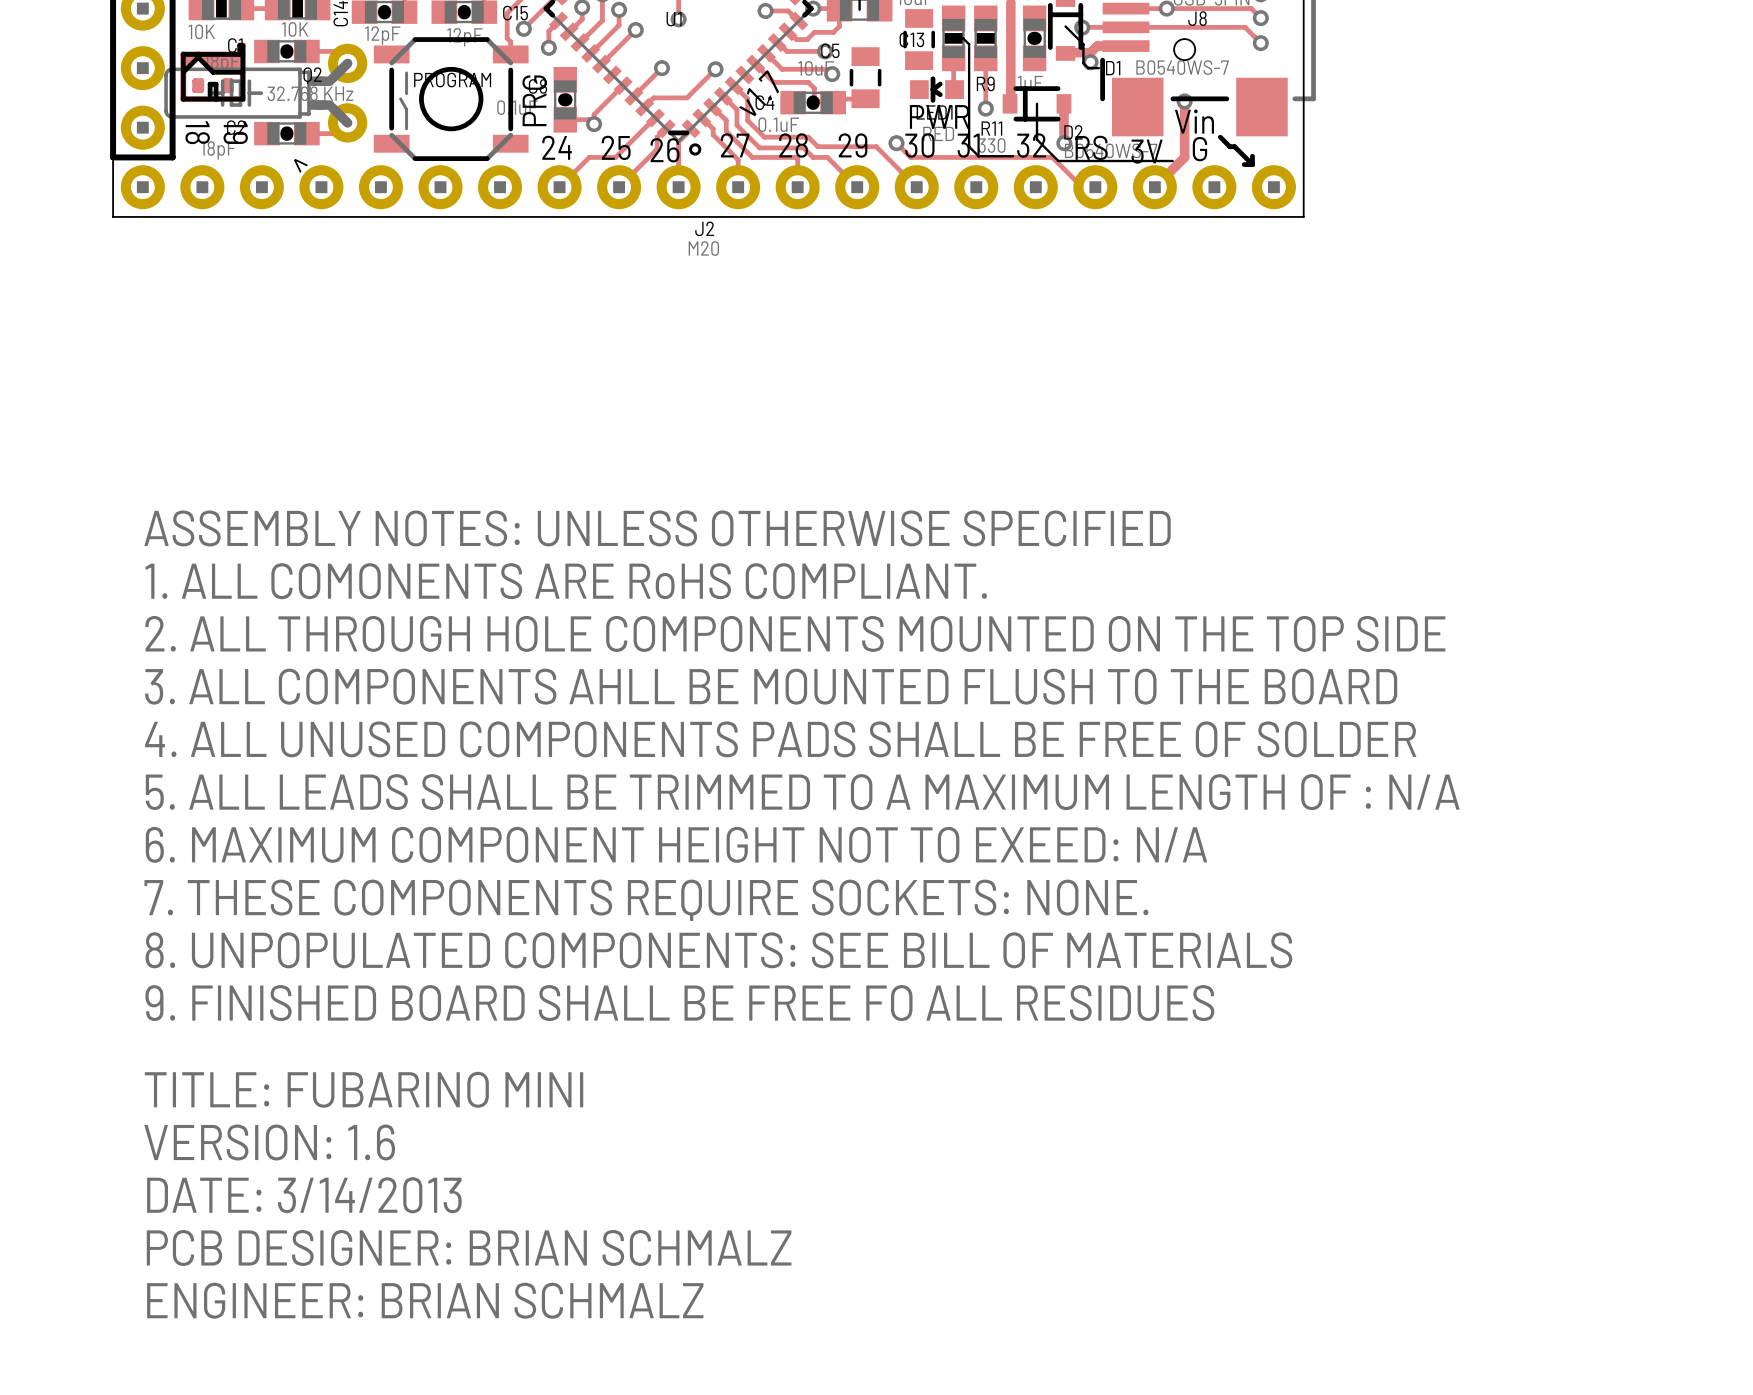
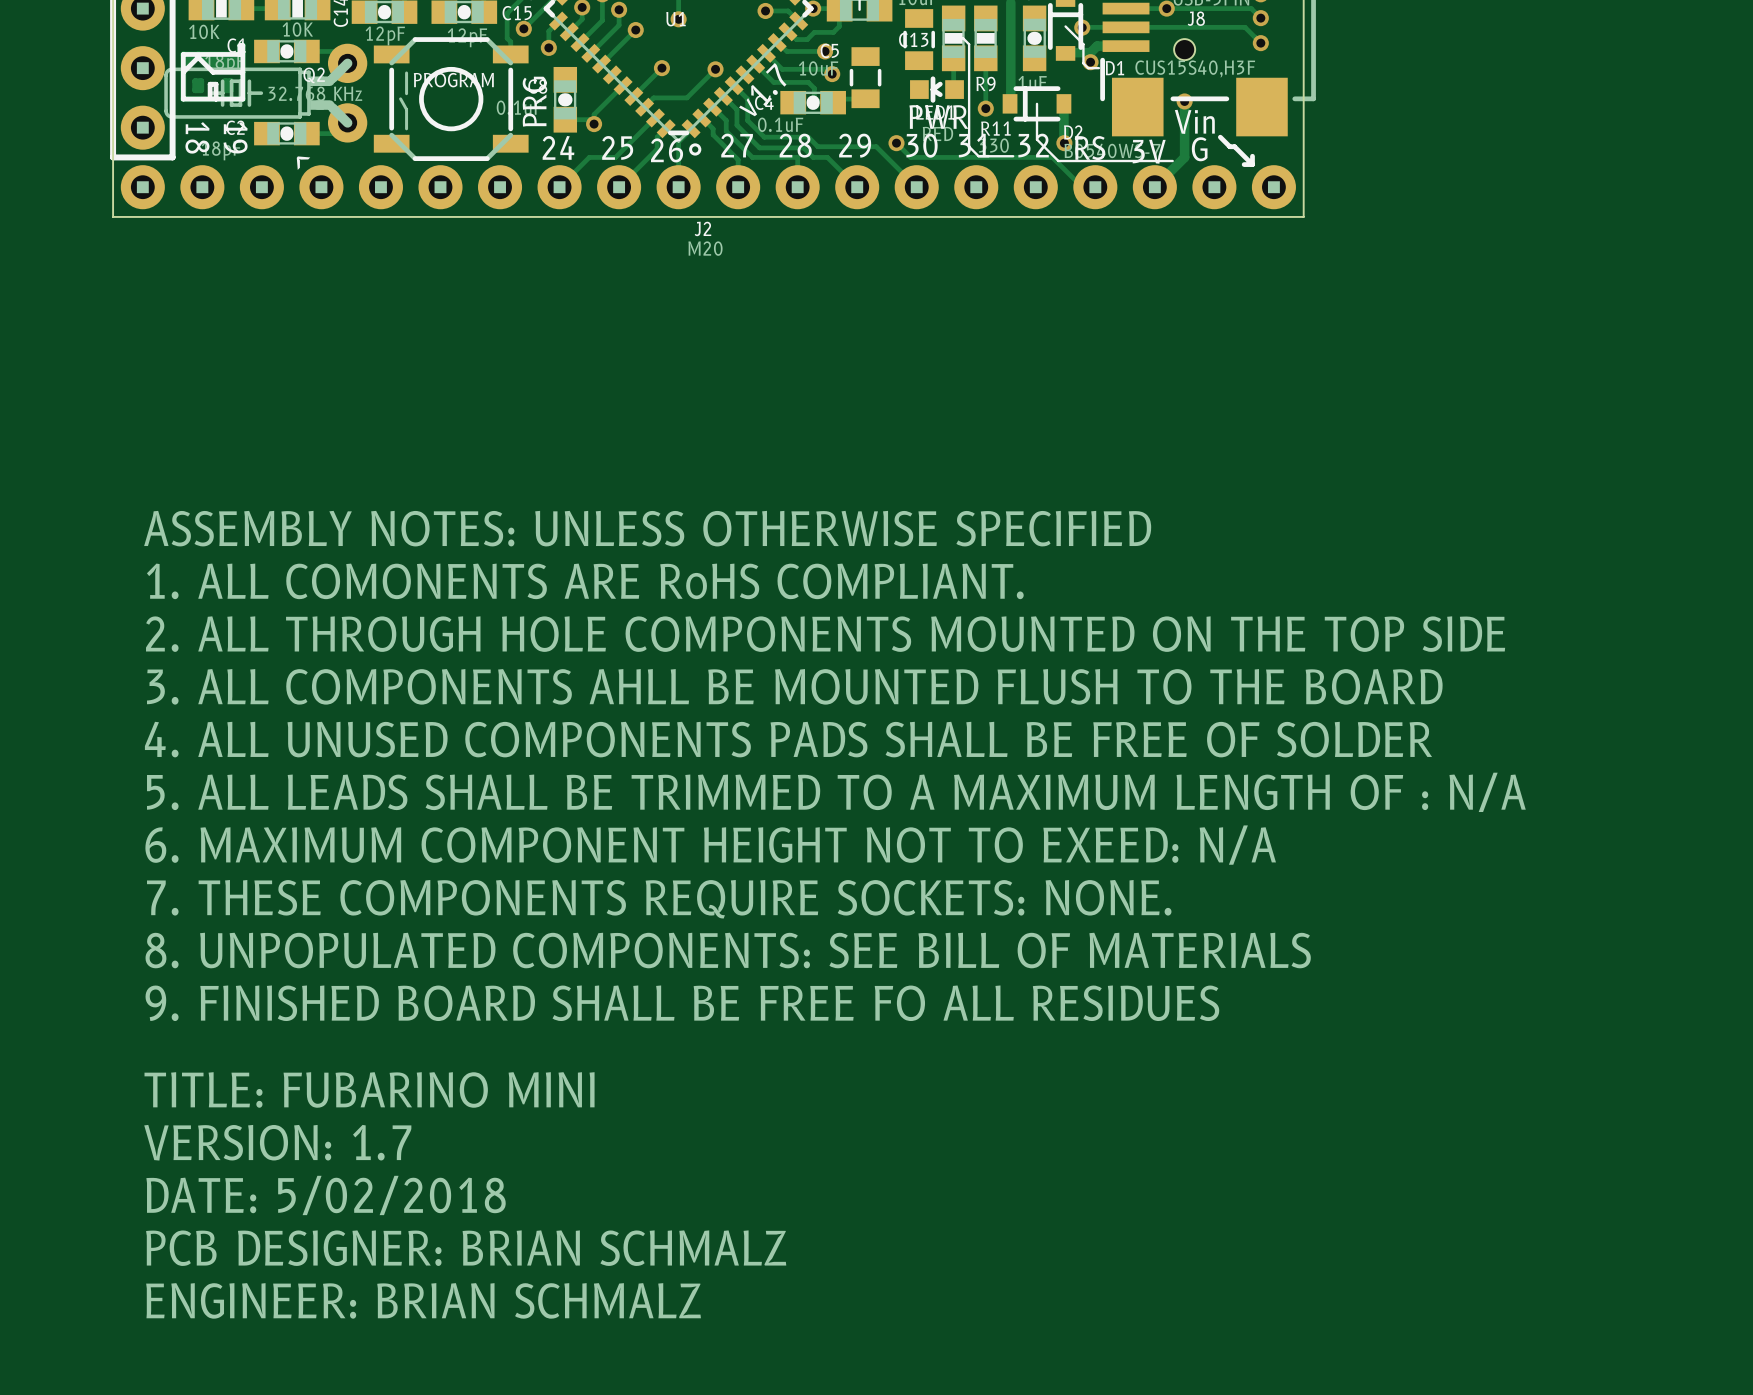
D1 value: B0540WS-7 (1182, 67) -> CUS15S40,H3F (1195, 68)
text: VERSION: 1.6 (269, 1142) -> VERSION: 1.7 (277, 1142)
text: DATE: 3/14/2013 (304, 1195) -> DATE: 5/02/2018 (326, 1195)

